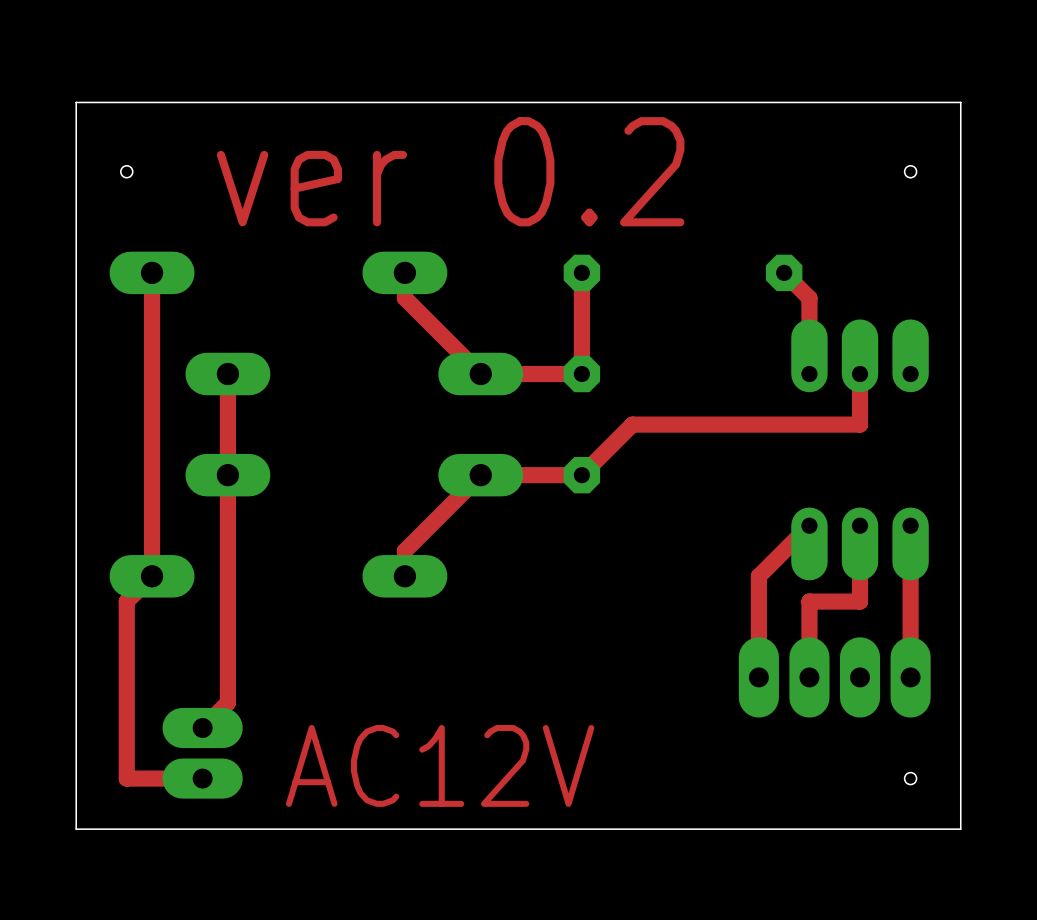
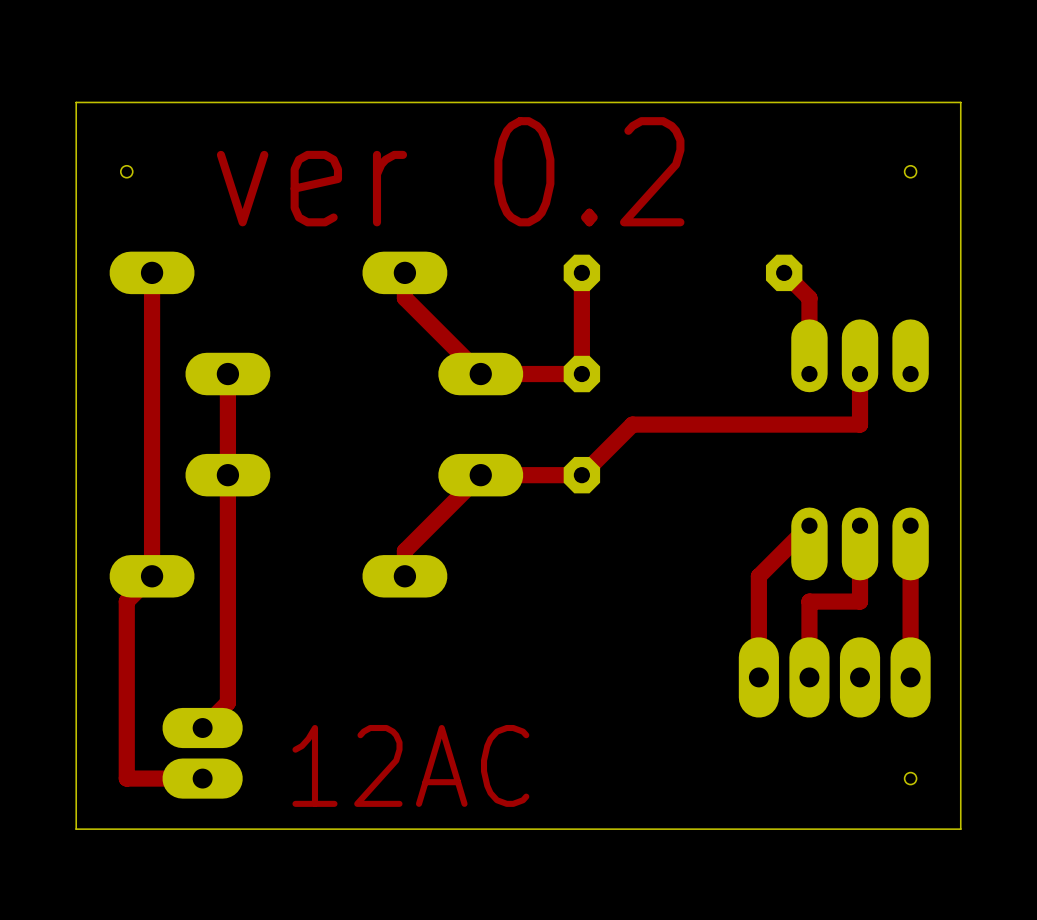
text: AC12V (440, 765) -> 12AC (410, 765)

